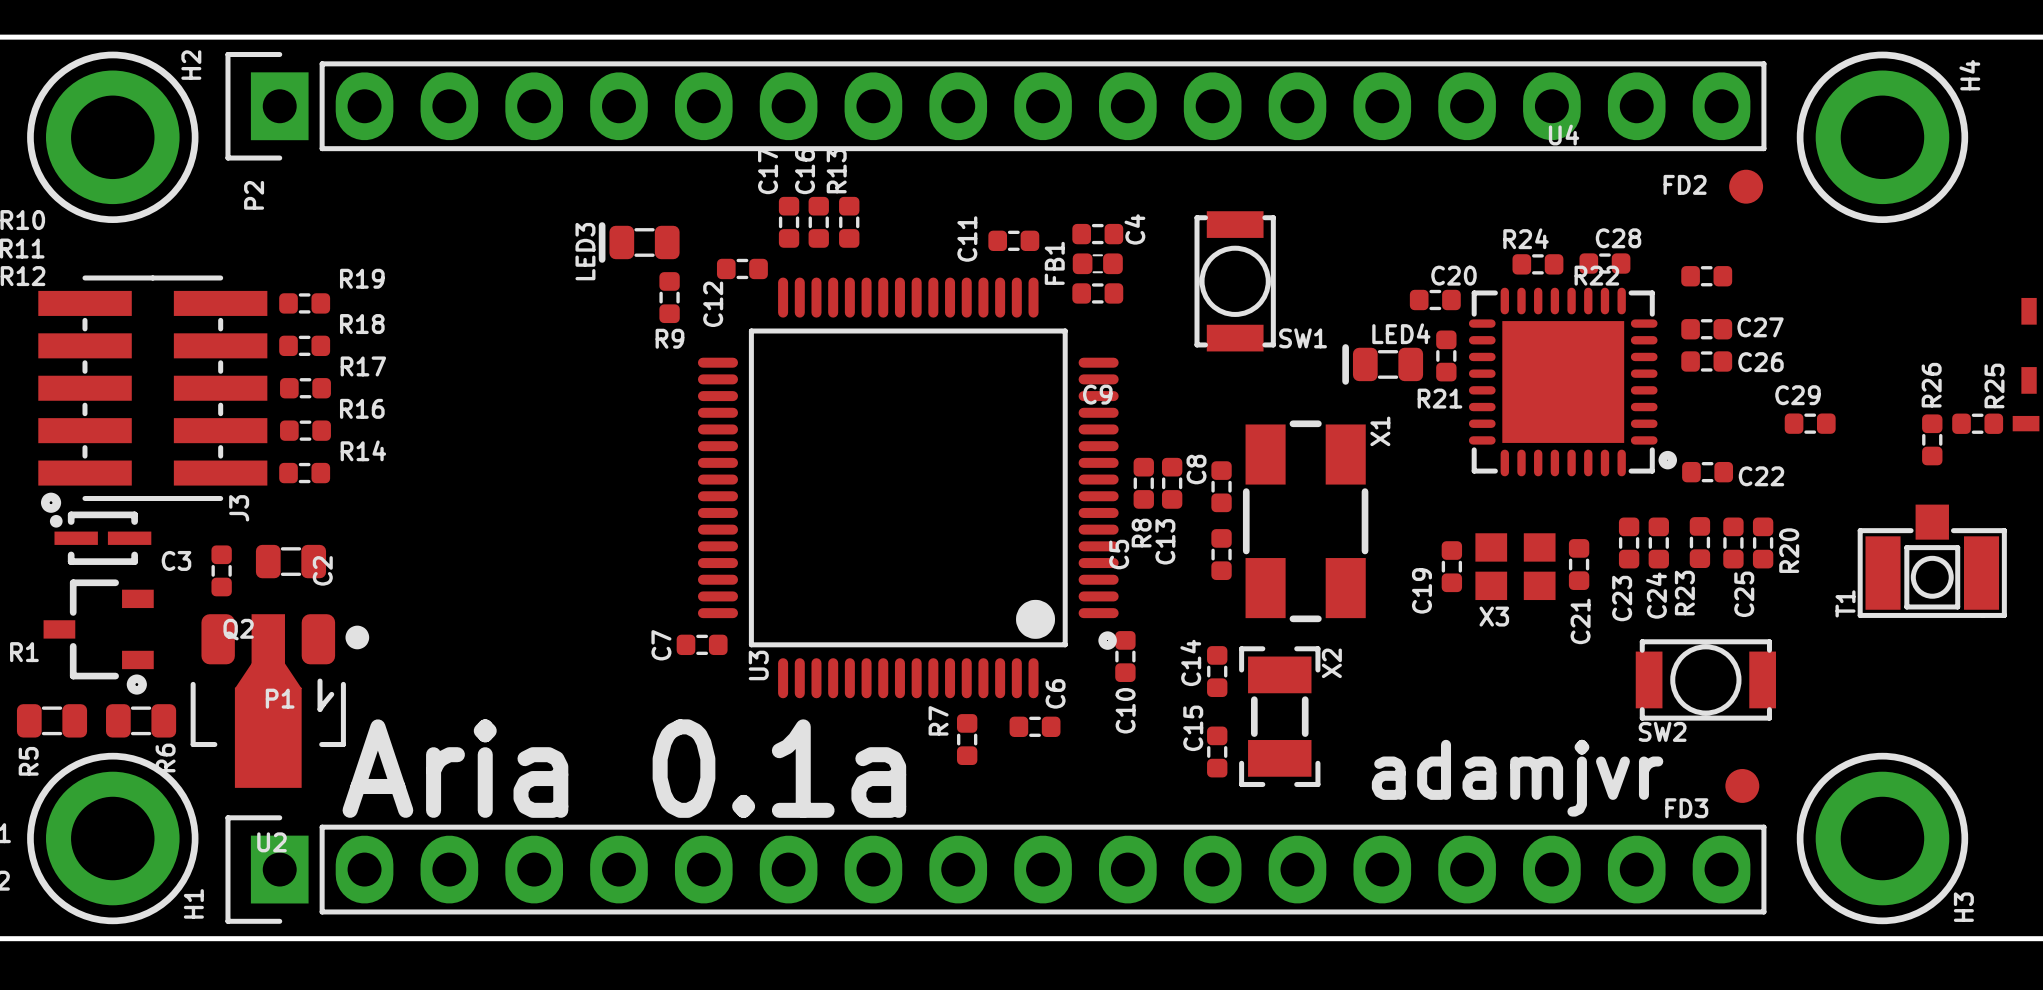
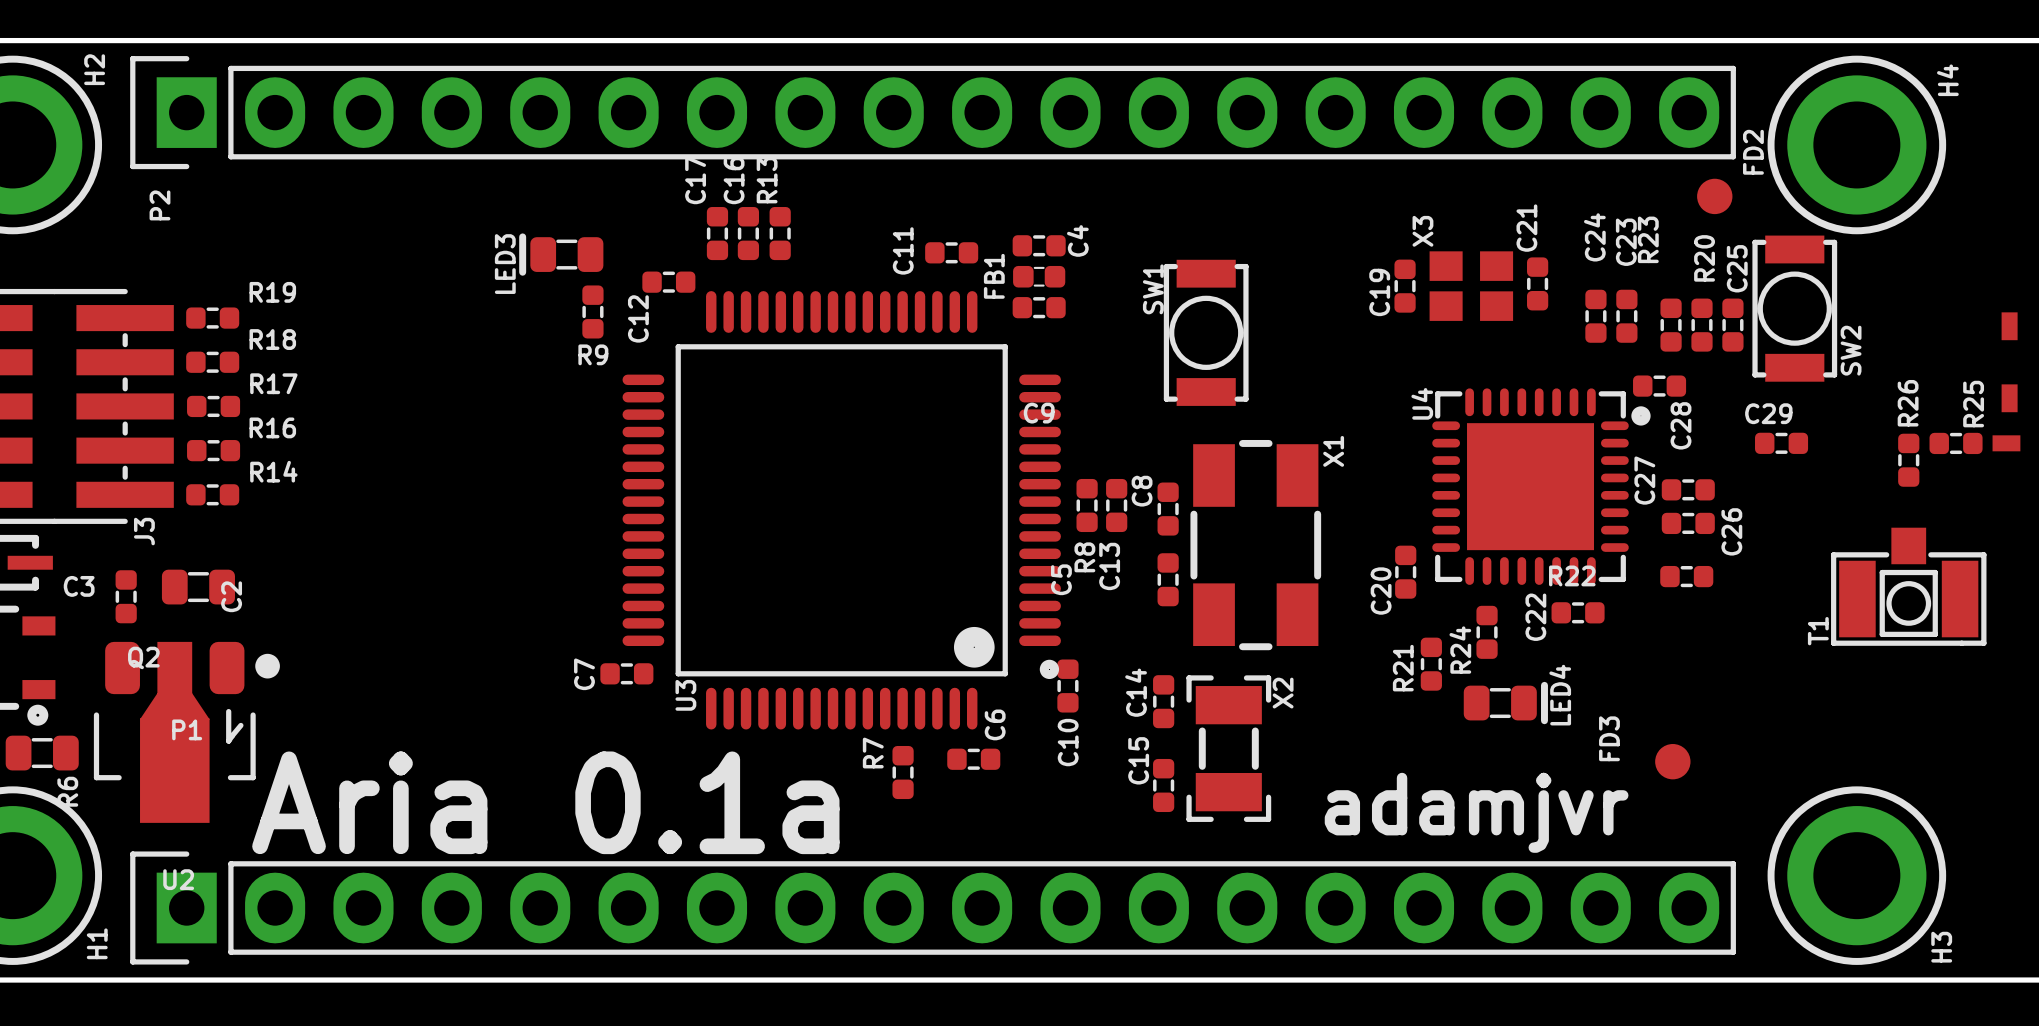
U4 name position: U4 (1564, 135) -> U4 (1422, 403)
FD2 name rotation: 0° (1685, 184) -> 90° counterclockwise (1753, 152)
FD2 name position: FD2 (1685, 184) -> FD2 (1753, 152)
C28 name rotation: 0° (1618, 238) -> 90° counterclockwise (1681, 425)
C28 name position: C28 (1618, 238) -> C28 (1681, 425)
C28 position: (1604, 263) -> (1659, 386)
R24 rotation: 0° (1537, 264) -> 90° clockwise (1487, 632)
R24 position: (1537, 264) -> (1487, 632)
R22 position: (1706, 276) -> (1686, 576)
SW1 position: (1235, 281) -> (1206, 332)
U4 footprint: [1468, 287, 1678, 477] -> [1432, 388, 1651, 585]
C20 rotation: 0° (1435, 299) -> 90° clockwise (1405, 572)
C20 position: (1435, 299) -> (1405, 572)
C27 name rotation: 0° (1760, 327) -> 90° counterclockwise (1644, 480)
C27 name position: C27 (1760, 327) -> C27 (1644, 480)
C27 position: (1706, 329) -> (1688, 489)
SW1 name rotation: 0° (1303, 338) -> 90° counterclockwise (1153, 289)
SW1 name position: SW1 (1303, 338) -> SW1 (1153, 289)
R21 position: (1446, 355) -> (1431, 664)
C26 position: (1706, 361) -> (1688, 523)
C26 name rotation: 0° (1760, 362) -> 90° counterclockwise (1731, 531)
LED4 rotation: 0° (1382, 364) -> 180° (1505, 703)
LED4 position: (1382, 364) -> (1505, 703)
R21 name rotation: 0° (1439, 398) -> 90° counterclockwise (1403, 668)
C22 position: (1707, 472) -> (1578, 612)
C22 name rotation: 0° (1761, 476) -> 90° counterclockwise (1535, 617)
C22 name position: C22 (1761, 476) -> C22 (1535, 617)
C23 position: (1629, 542) -> (1626, 316)
C24 position: (1658, 542) -> (1595, 316)
R23 position: (1699, 542) -> (1671, 325)
C25 position: (1733, 542) -> (1732, 325)
R20 position: (1763, 542) -> (1701, 325)
R20 name position: R20 (1789, 550) -> R20 (1704, 258)
C21 position: (1579, 564) -> (1537, 283)
C19 position: (1451, 566) -> (1405, 286)
X3 position: (1515, 566) -> (1471, 286)
C19 name position: C19 (1421, 590) -> C19 (1379, 292)
R23 name position: R23 (1684, 593) -> R23 (1648, 239)
C25 name position: C25 (1744, 594) -> C25 (1737, 268)
C24 name position: C24 (1656, 595) -> C24 (1594, 237)
C23 name position: C23 (1622, 598) -> C23 (1626, 242)
X3 name rotation: 0° (1494, 616) -> 90° counterclockwise (1422, 231)
X3 name position: X3 (1494, 616) -> X3 (1422, 231)
C21 name position: C21 (1580, 621) -> C21 (1526, 228)
SW2 rotation: 0° (1705, 679) -> 90° clockwise (1794, 308)
SW2 position: (1705, 679) -> (1794, 308)
SW2 name position: SW2 (1662, 731) -> SW2 (1851, 350)
FD3 position: (1742, 785) -> (1672, 761)
FD3 name rotation: 0° (1686, 808) -> 90° counterclockwise (1609, 738)

